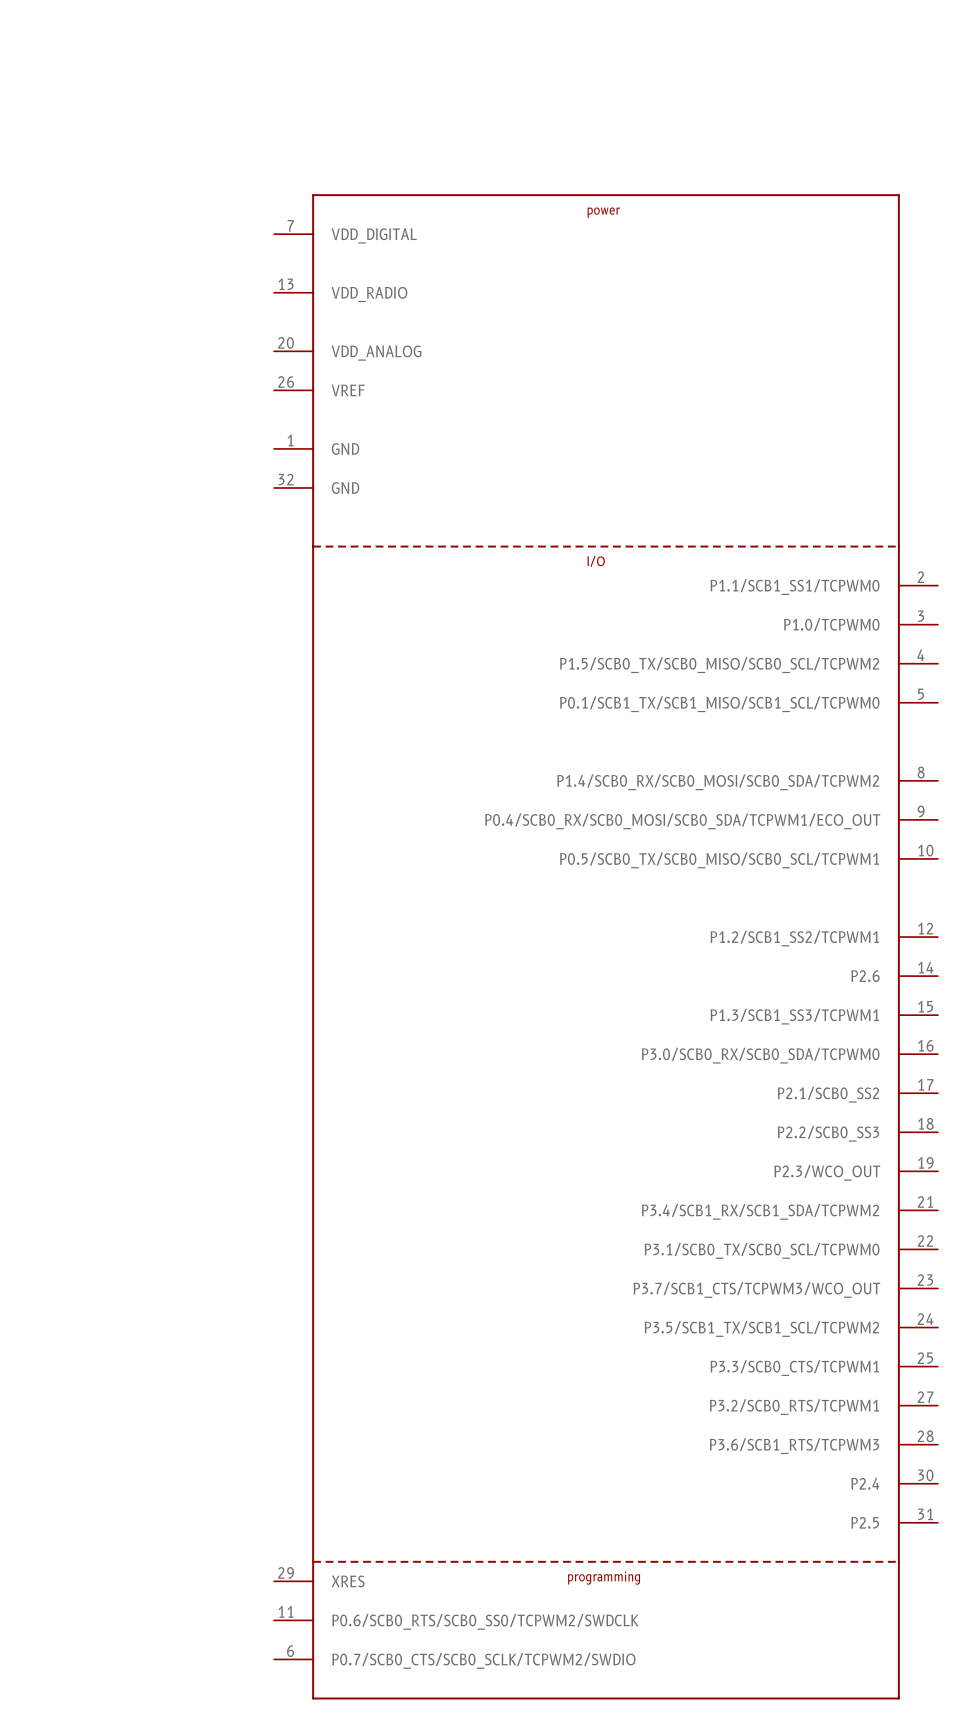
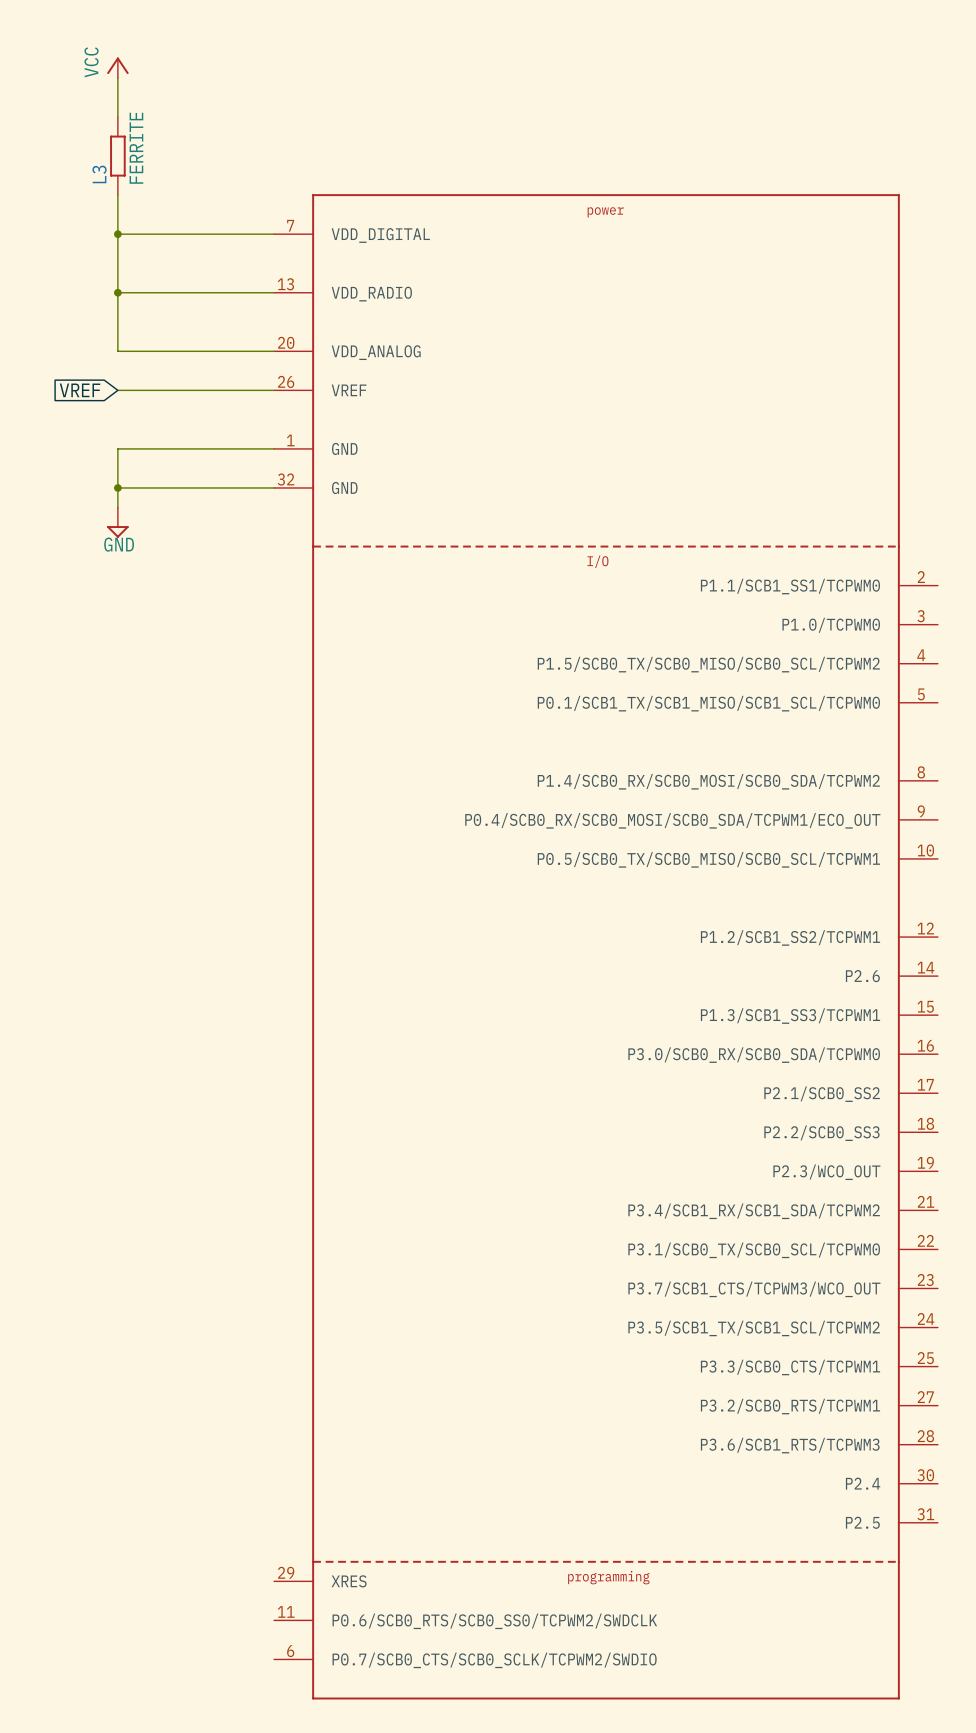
power symbol: none -> VCC (117, 67)
wire: none -> (117, 77) (117, 117)
L3: none -> FERRITE (117, 156)
wire: none -> (117, 195) (117, 351) (274, 351)
wire: none -> (117, 234) (274, 234)
junction: none -> (117, 234)
wire: none -> (117, 292) (274, 292)
junction: none -> (117, 292)
global label: none -> VREF (80, 390)
wire: none -> (117, 390) (274, 390)
wire: none -> (274, 448) (117, 448) (117, 507)
wire: none -> (117, 487) (274, 487)
junction: none -> (117, 487)
power symbol: none -> GND (117, 522)

